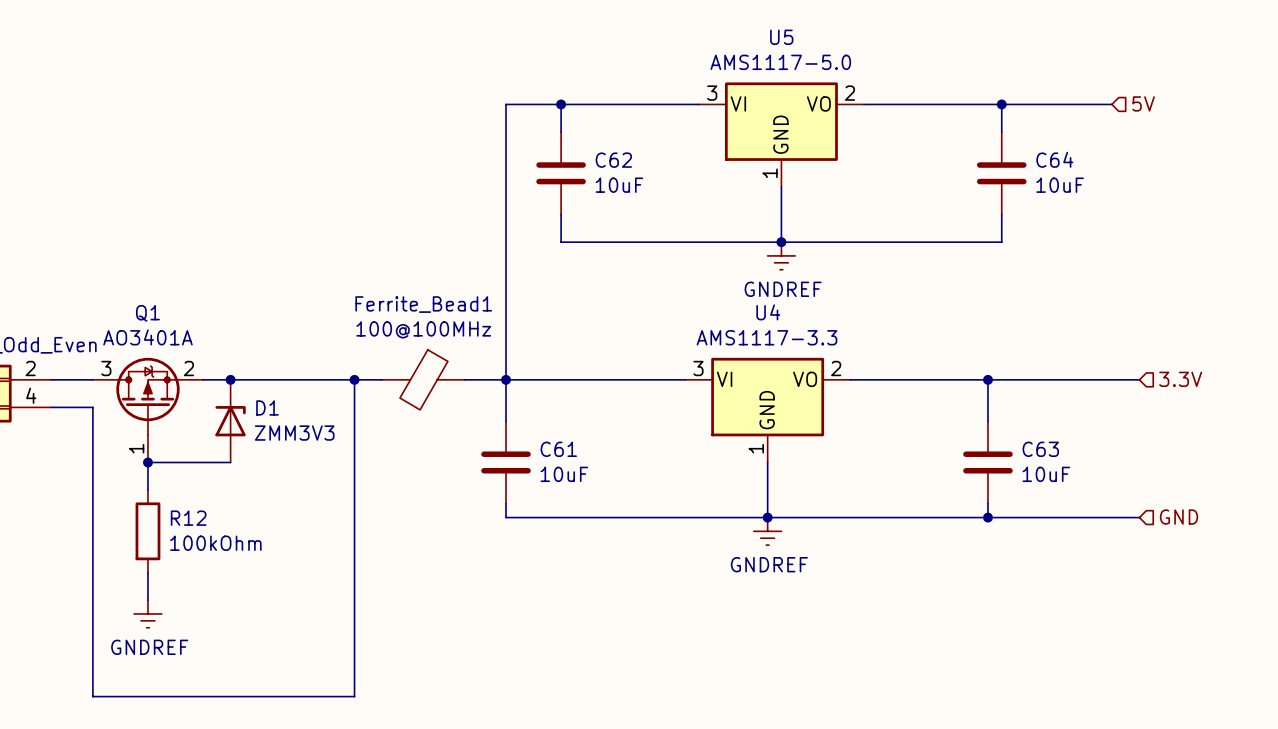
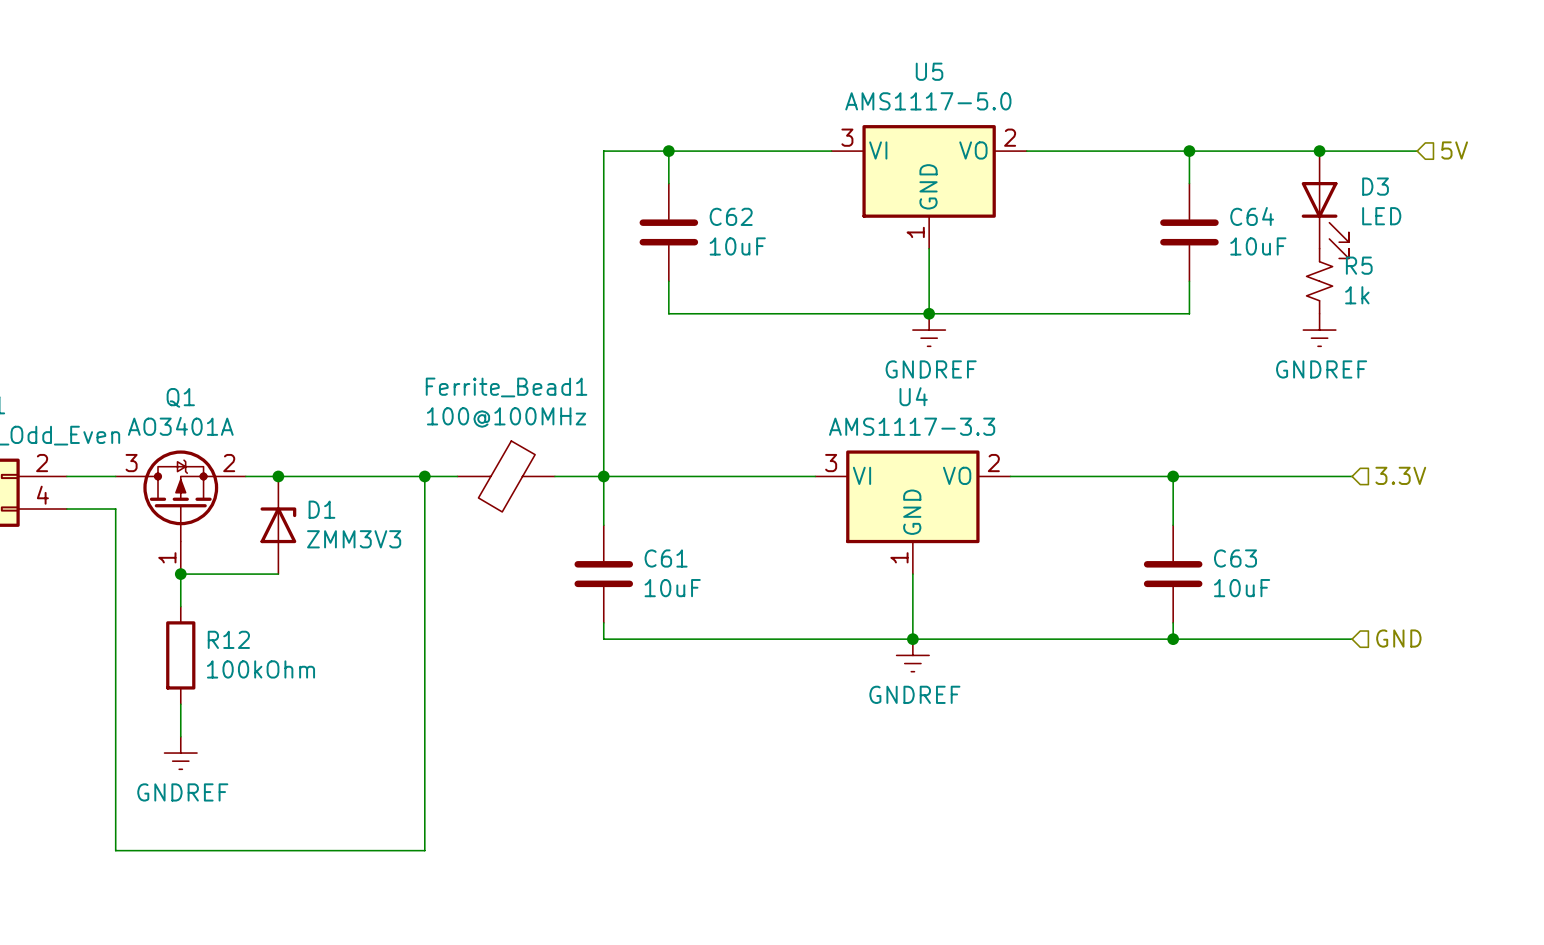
hierarchical label position: 5V (1143, 103) -> 5V (1454, 150)
wire: none -> (1319, 151) (1417, 151)
junction: none -> (1319, 151)
D3: none -> LED (1325, 204)
R5: none -> 1k (1319, 281)
power symbol: none -> GNDREF (1319, 330)

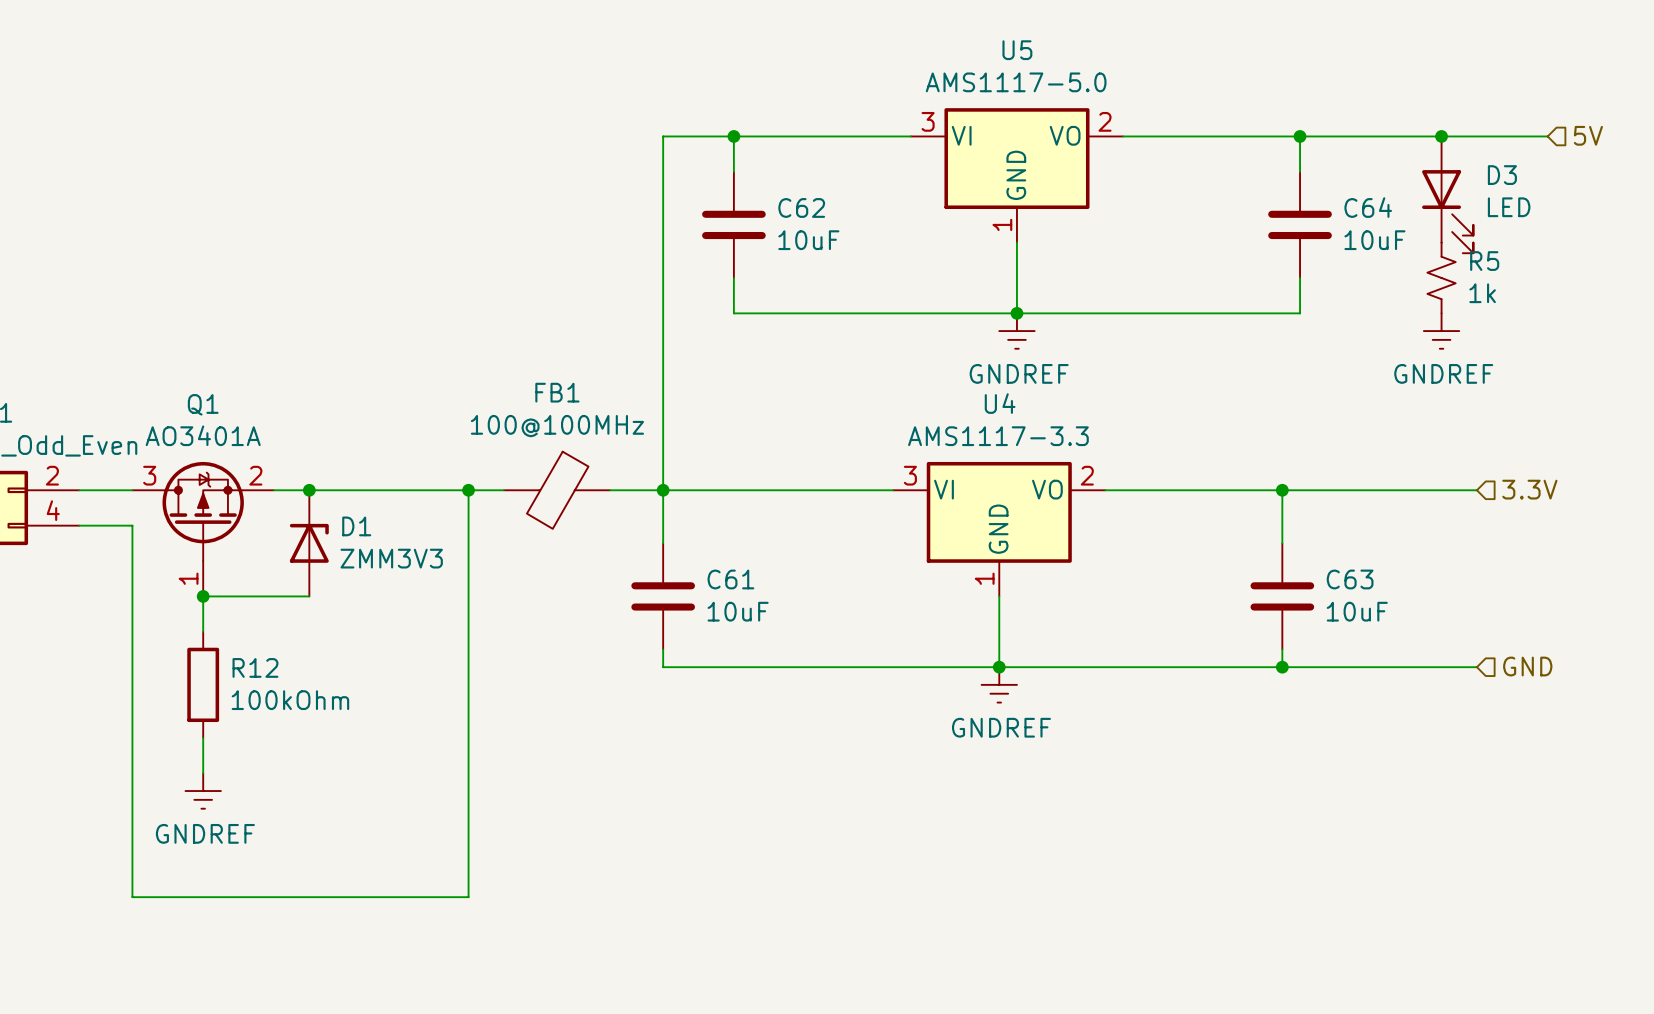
Ferrite_Bead1 name: Ferrite_Bead1 (506, 387) -> FB1 (557, 392)

